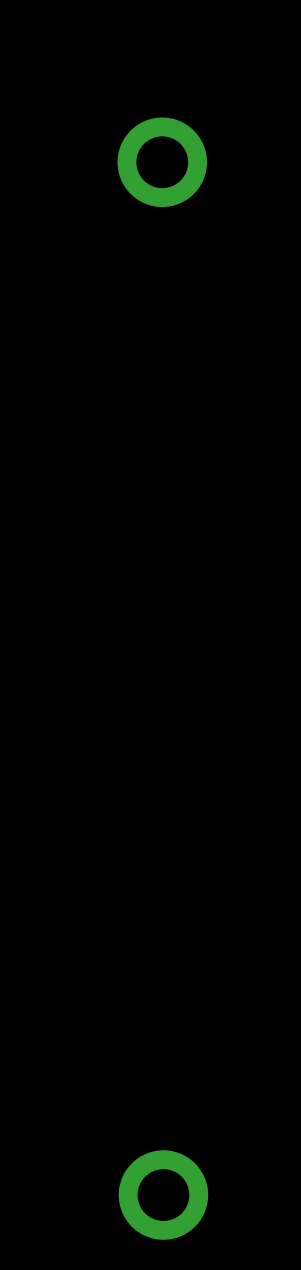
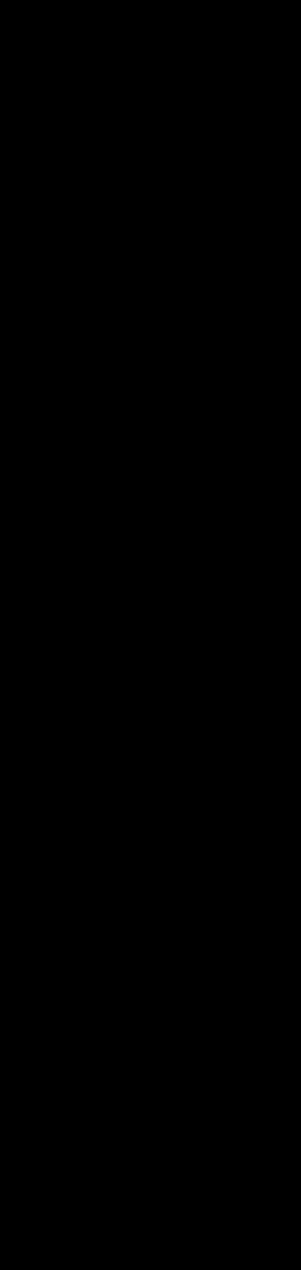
part: (162, 162) -> none
part: (163, 1195) -> none

